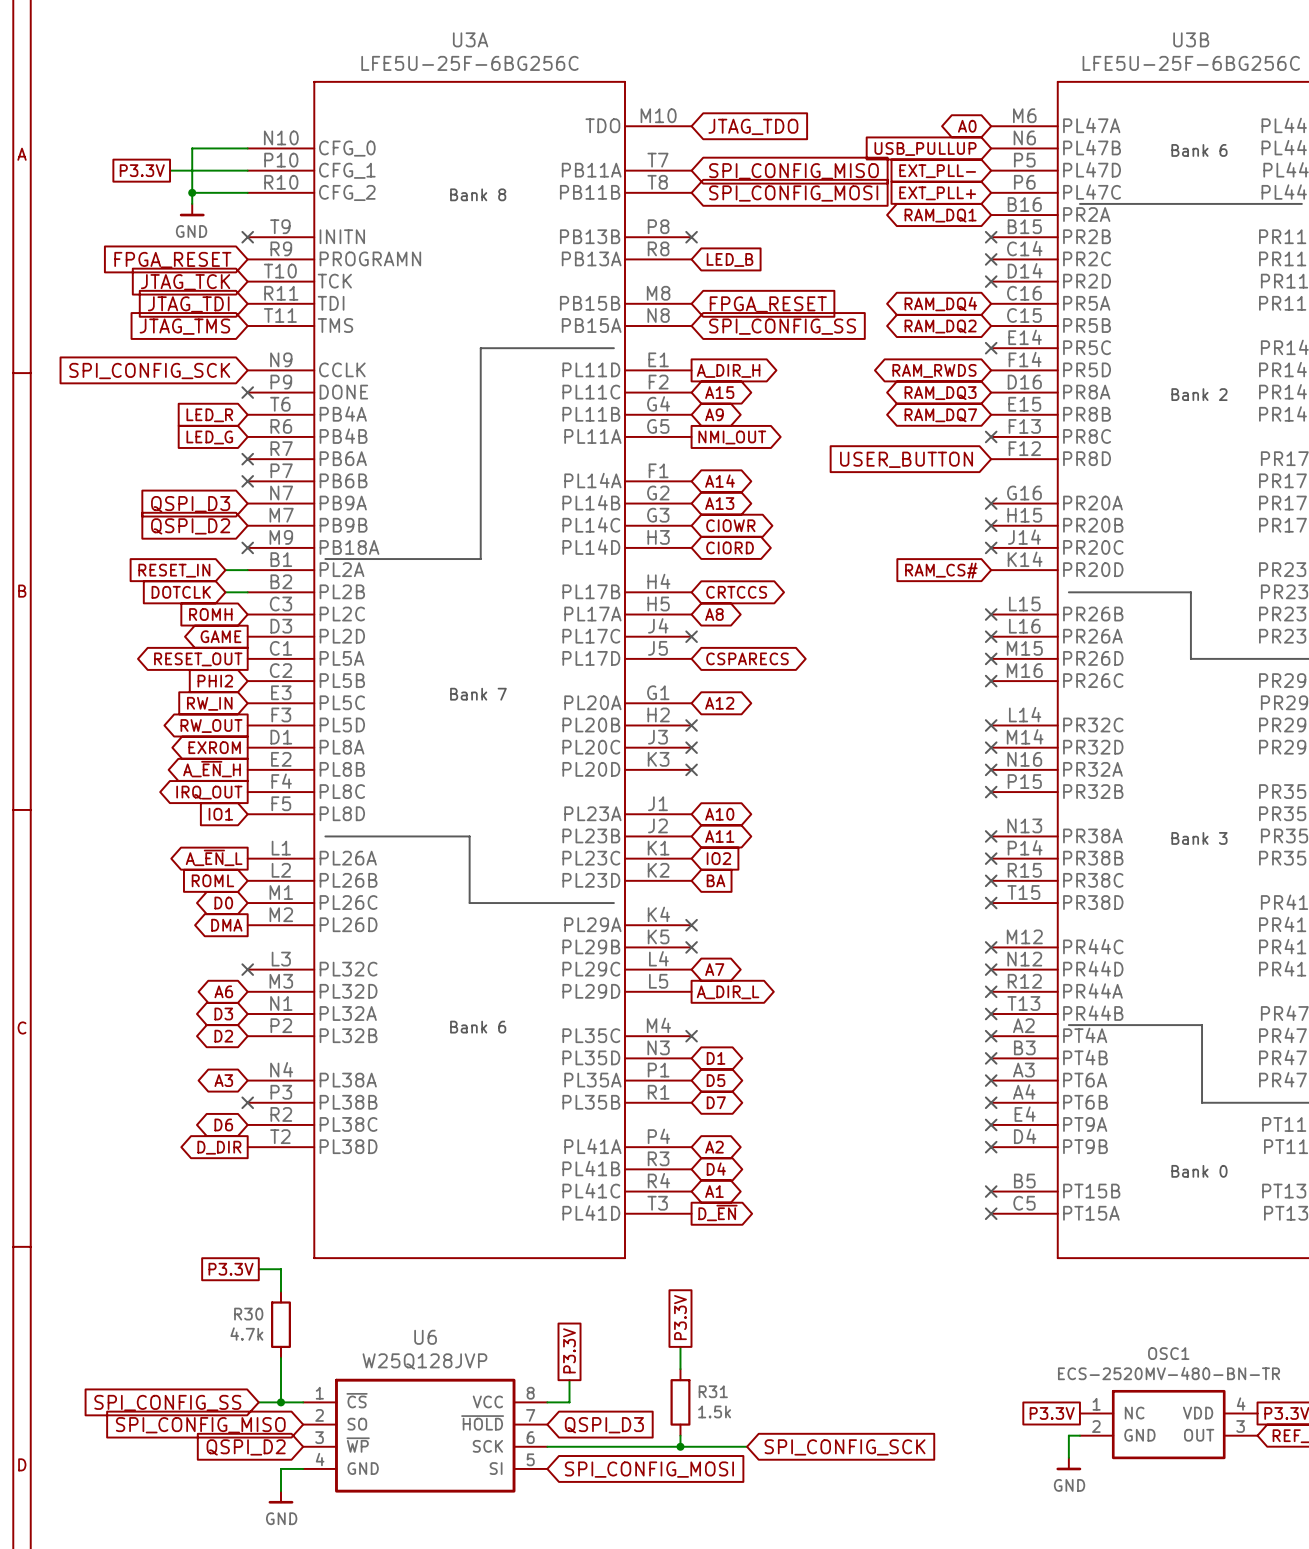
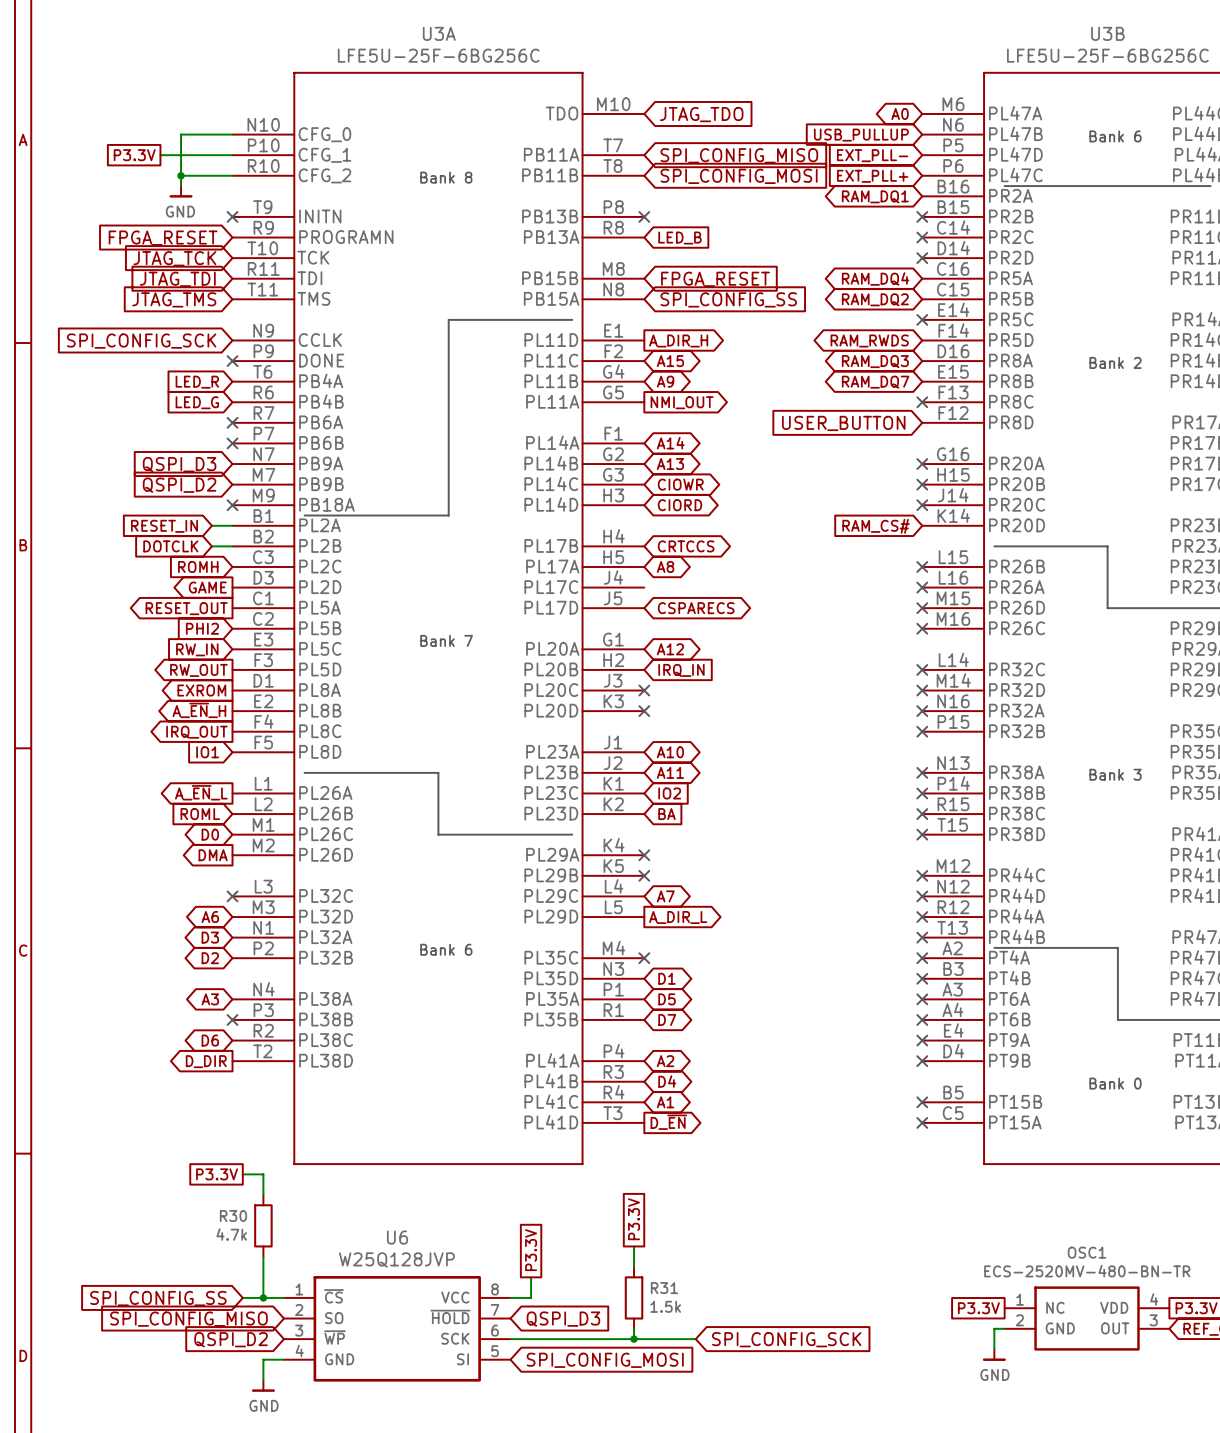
no-connect mark: (691, 636) -> none
no-connect mark: (691, 725) -> none
global label: none -> IRQ_IN (681, 670)

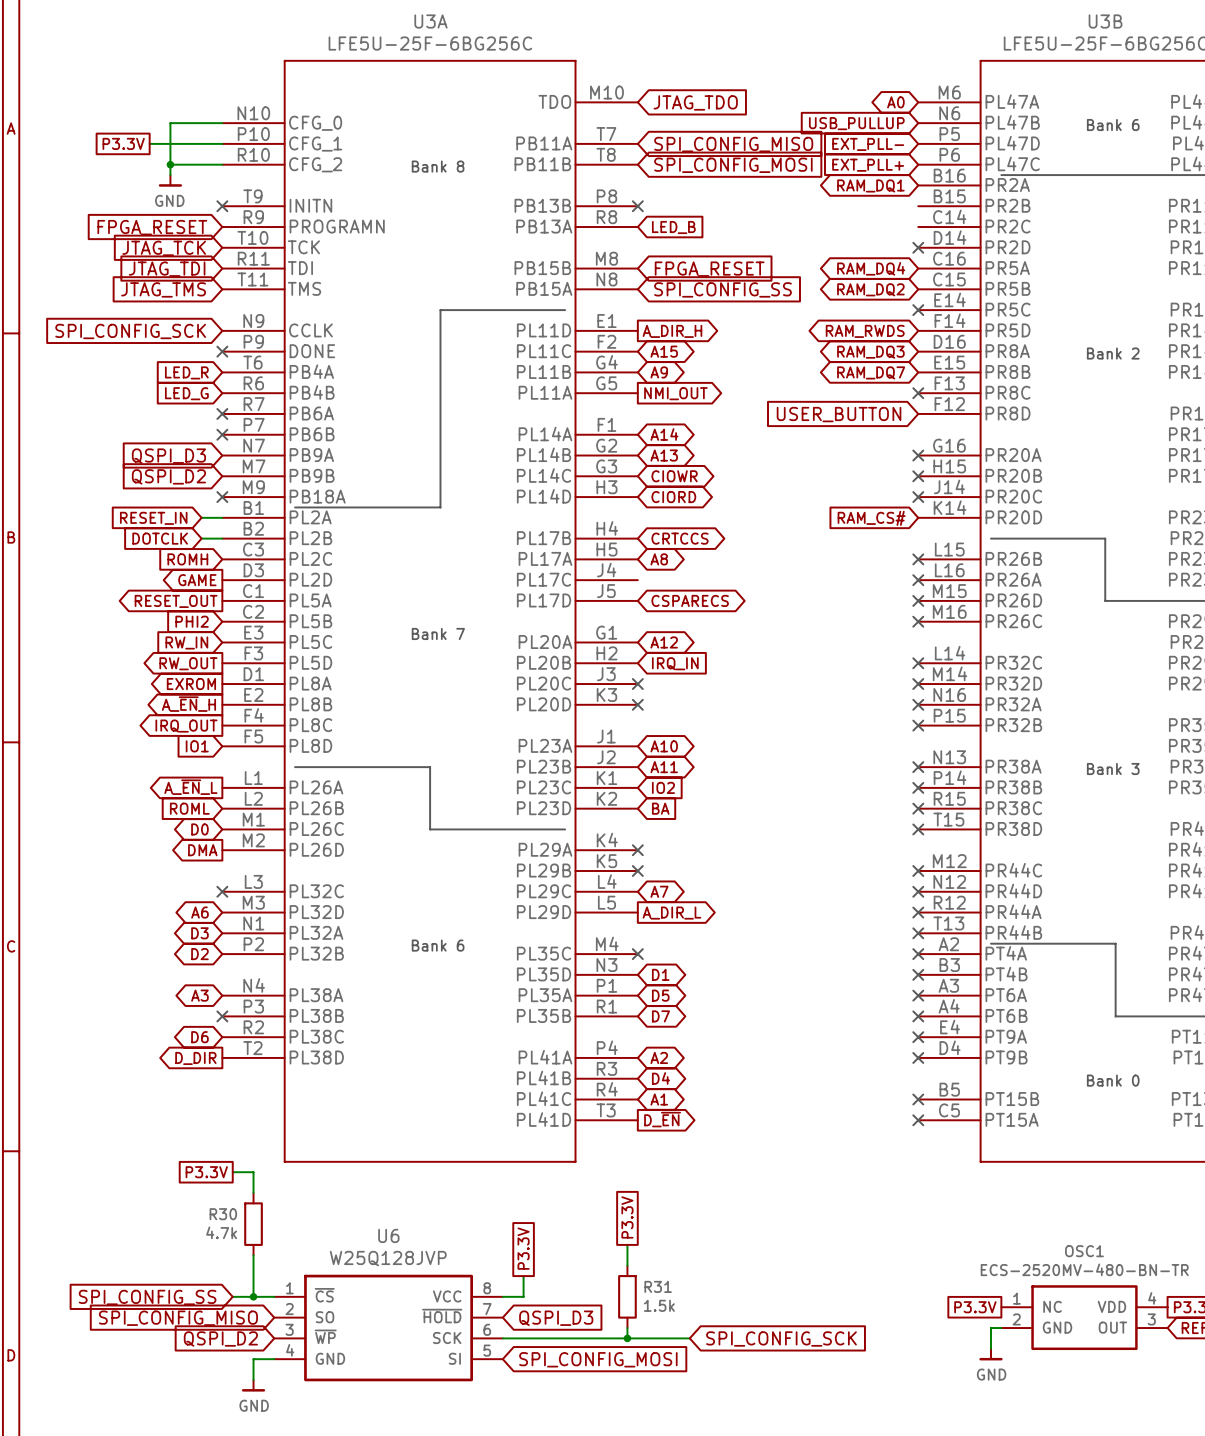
no-connect mark: (922, 216) -> none
no-connect mark: (922, 237) -> none

